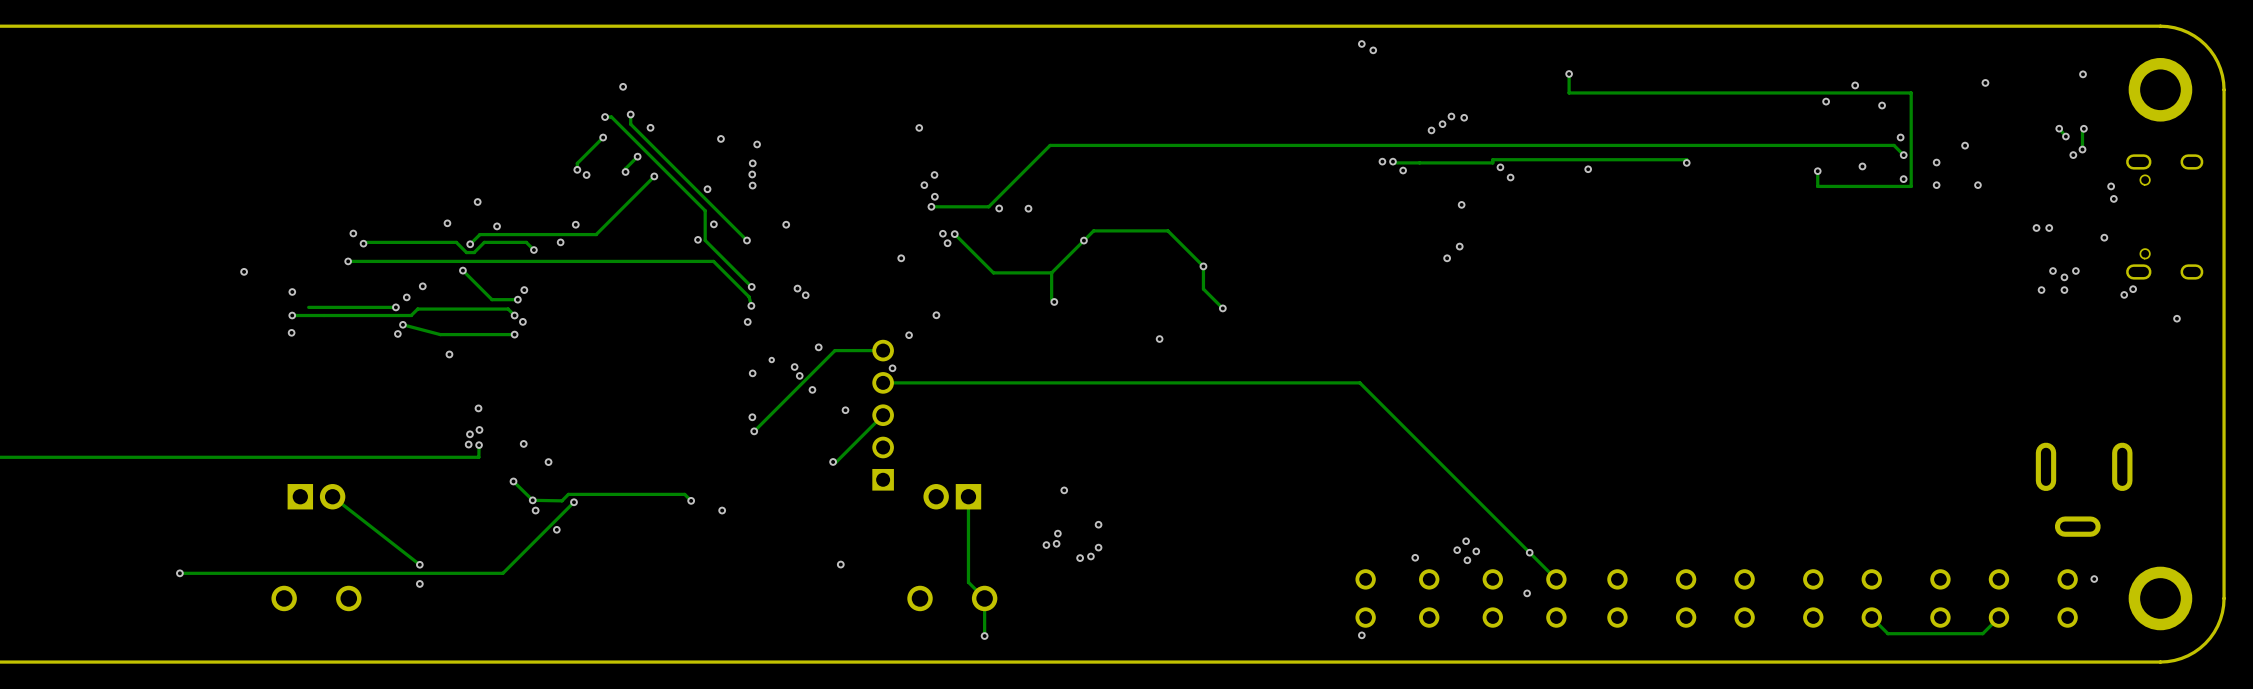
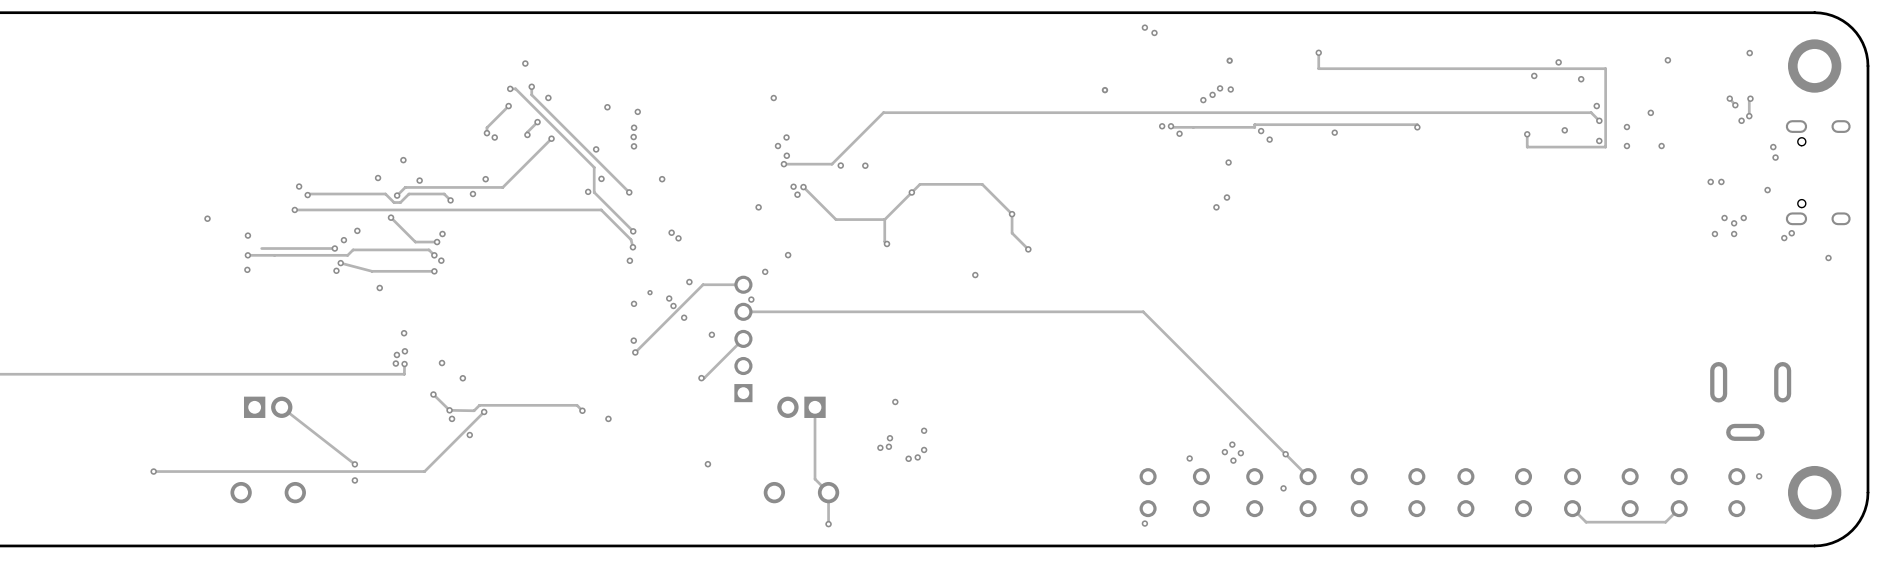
via: none -> (1229, 60)
via: none -> (1104, 90)

